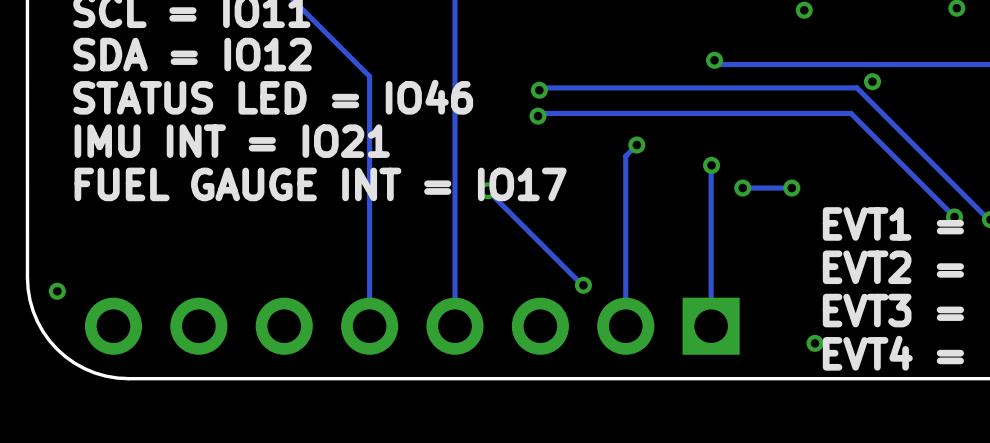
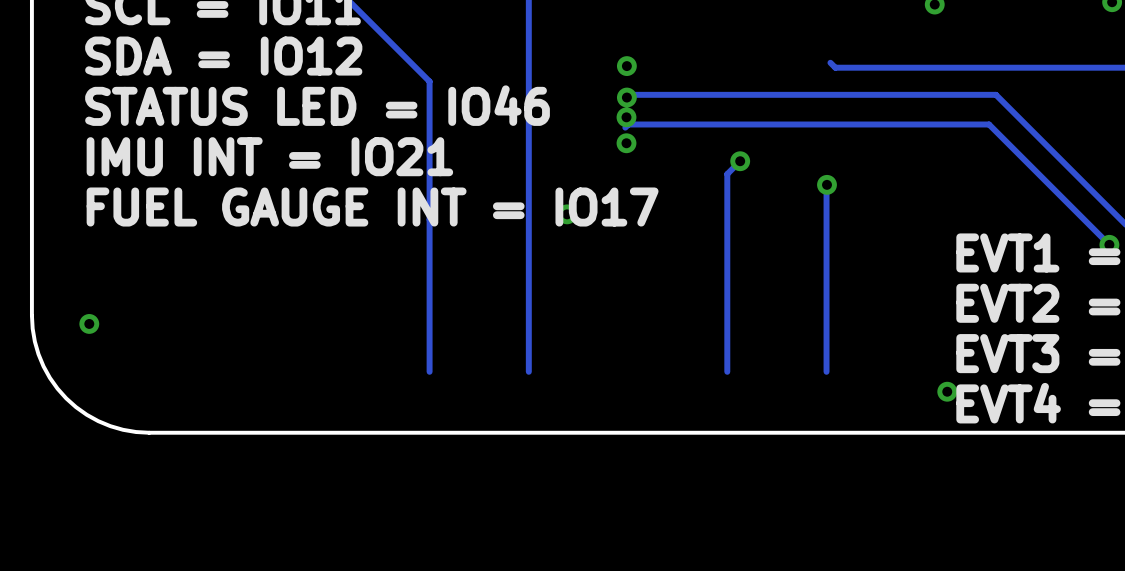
via: (714, 60) -> none
via: none -> (626, 66)
via: (872, 81) -> none
via: none -> (626, 117)
via: (538, 116) -> none
via: none -> (626, 143)
via: (742, 188) -> none
track: (791, 188) (742, 188) -> none
via: (791, 188) -> none
track: (487, 190) (583, 285) -> none
via: (583, 285) -> none
via position: (57, 291) -> (89, 323)
part: (412, 326) -> none

